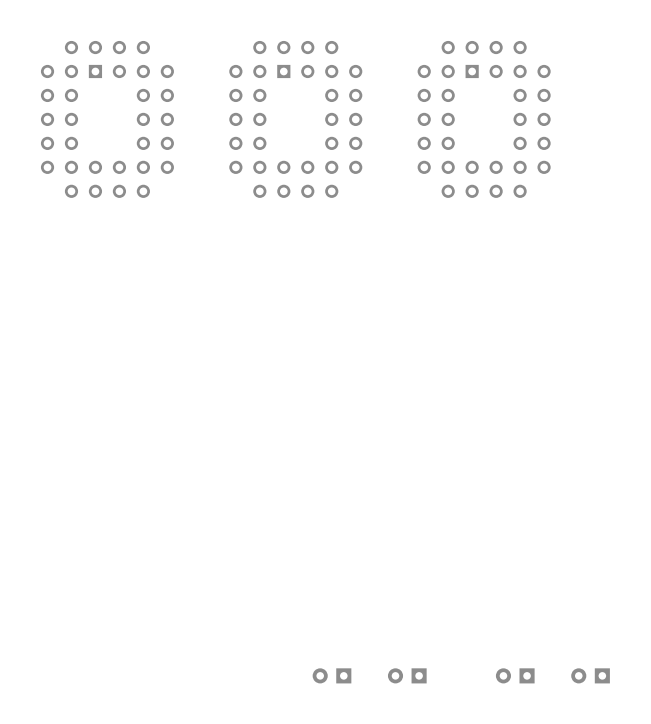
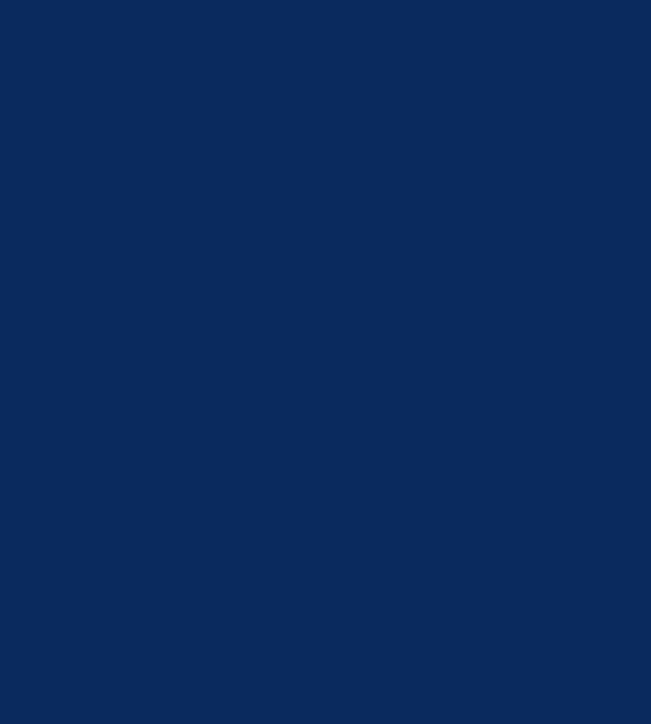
part: (107, 119) -> none
part: (295, 119) -> none
part: (484, 119) -> none
part: (332, 675) -> none
part: (407, 675) -> none
part: (515, 675) -> none
part: (590, 675) -> none

